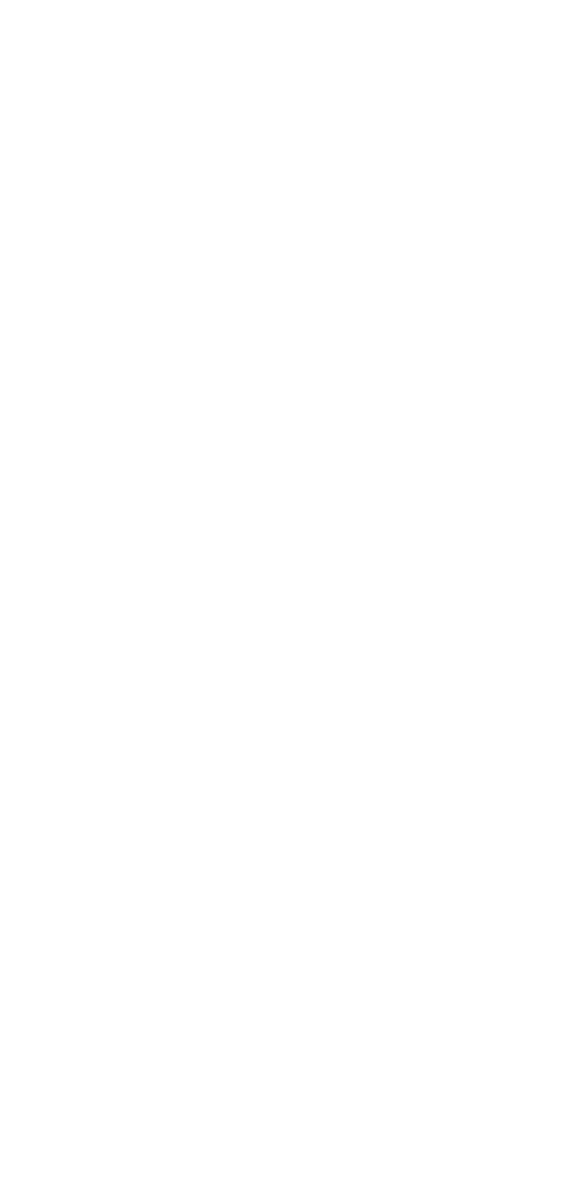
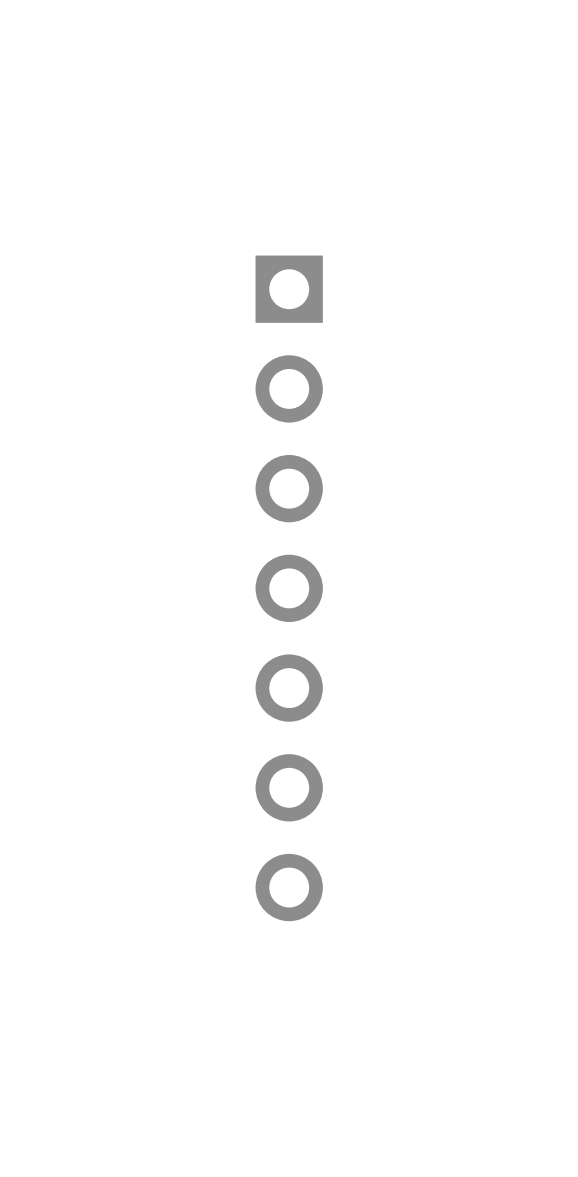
part: none -> (289, 588)

